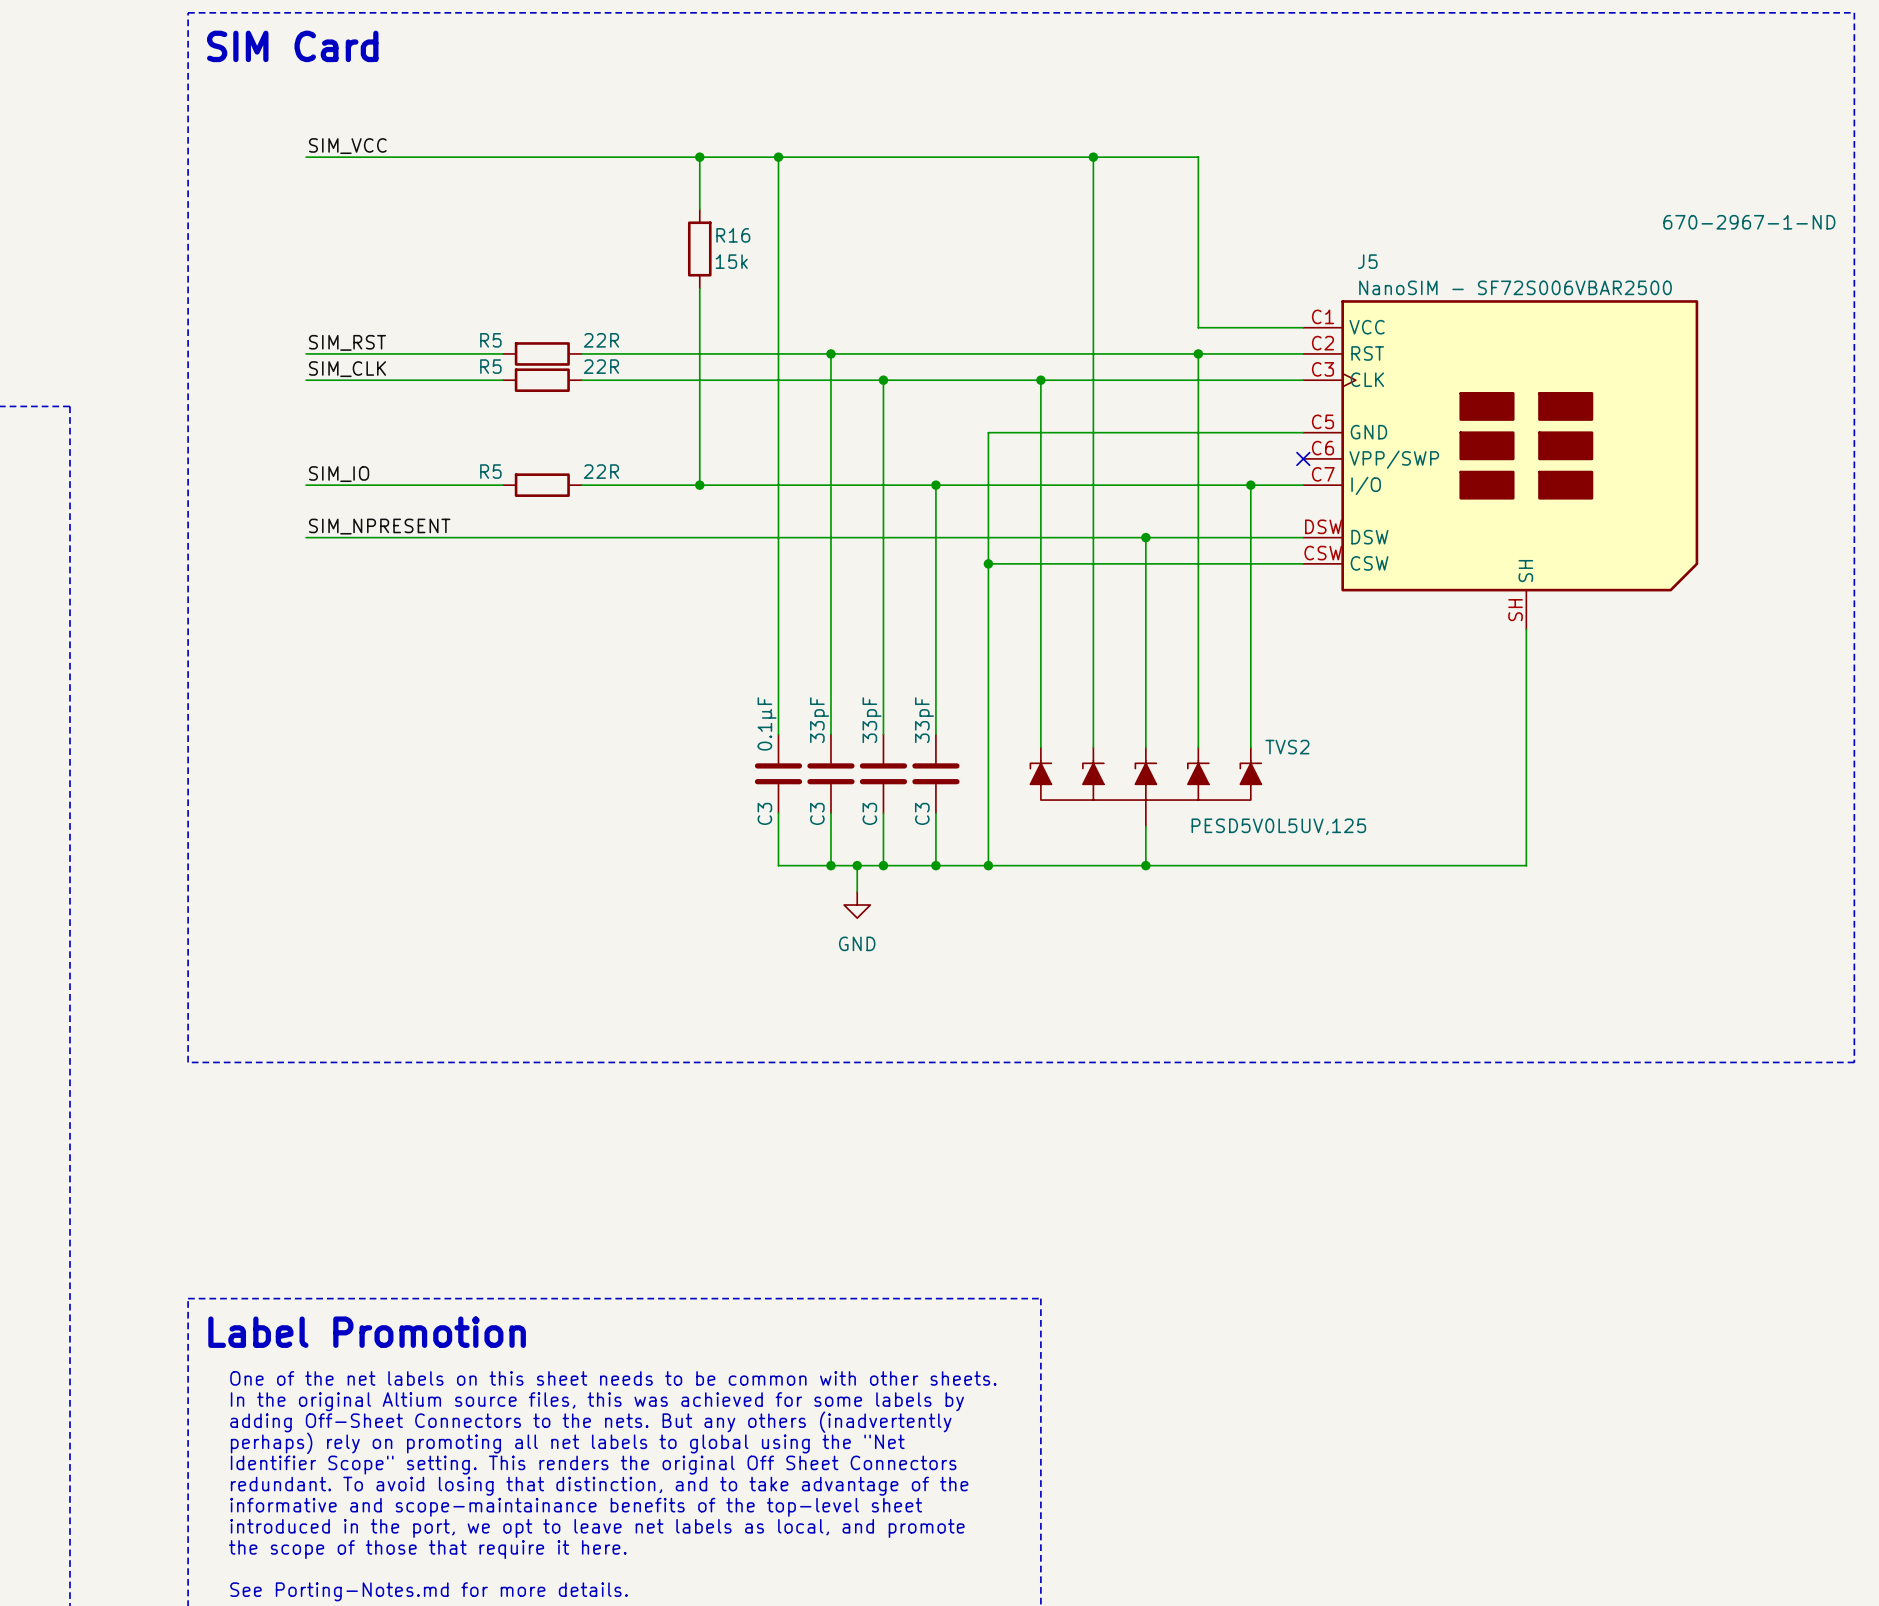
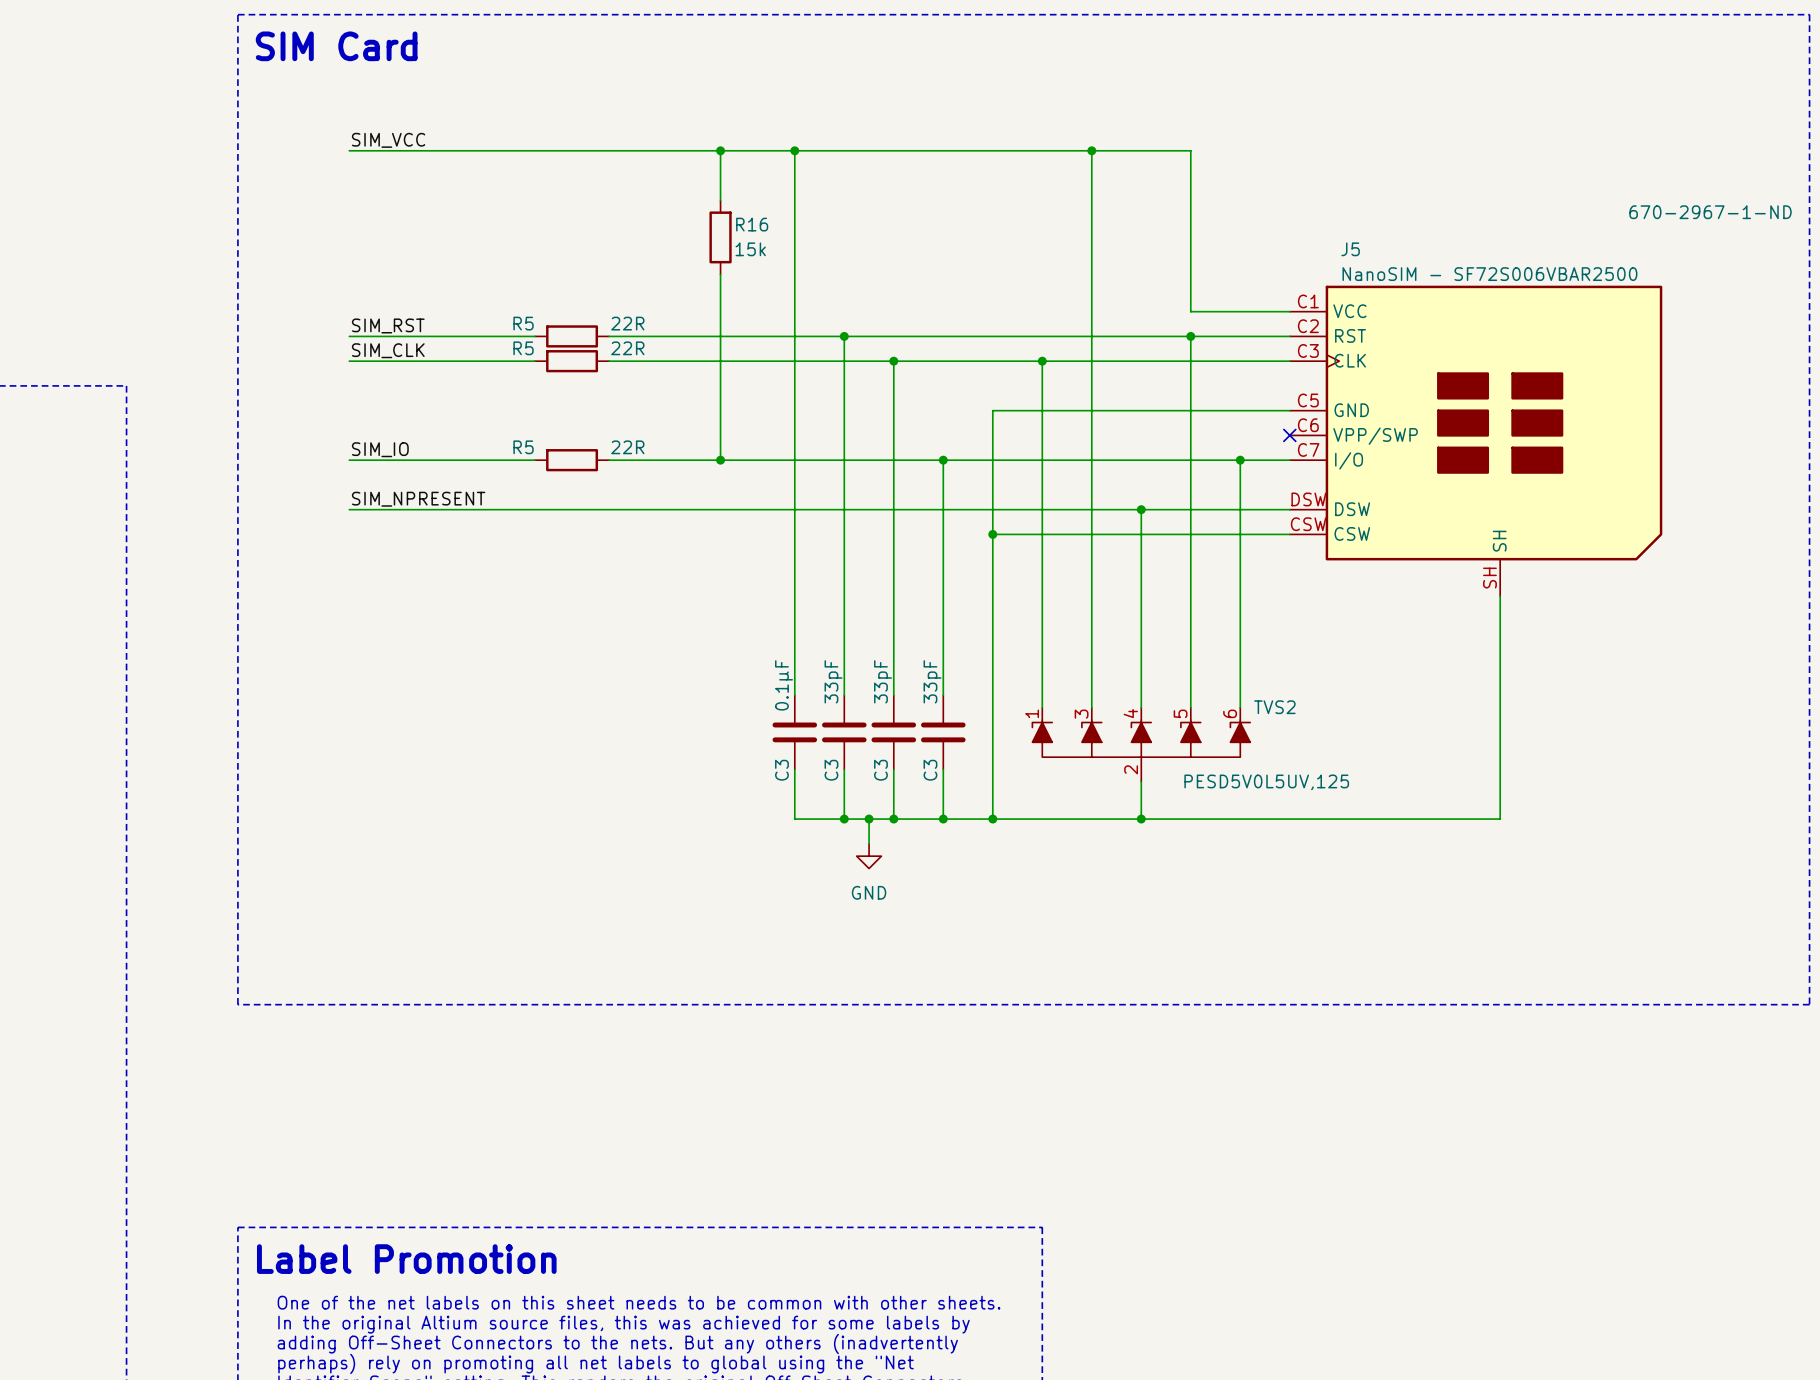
TVS2 pin number: none -> 4 (1130, 713)
TVS2 pin number: none -> 1 (1032, 713)
TVS2 pin number: none -> 3 (1081, 714)
TVS2 pin number: none -> 5 (1180, 713)
TVS2 pin number: none -> 6 (1230, 713)
TVS2 pin number: none -> 2 (1131, 769)

